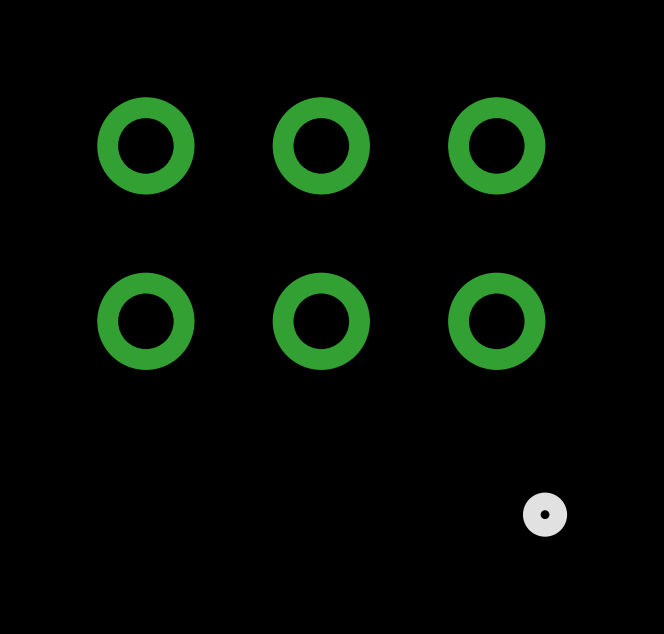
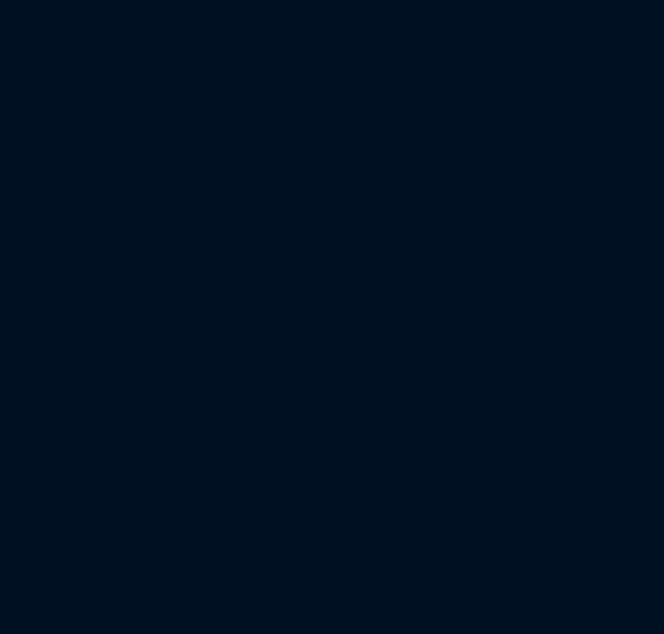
part: (145, 145) -> none
part: (321, 145) -> none
part: (496, 145) -> none
part: (145, 321) -> none
part: (321, 321) -> none
part: (496, 321) -> none
part: (545, 514) -> none

